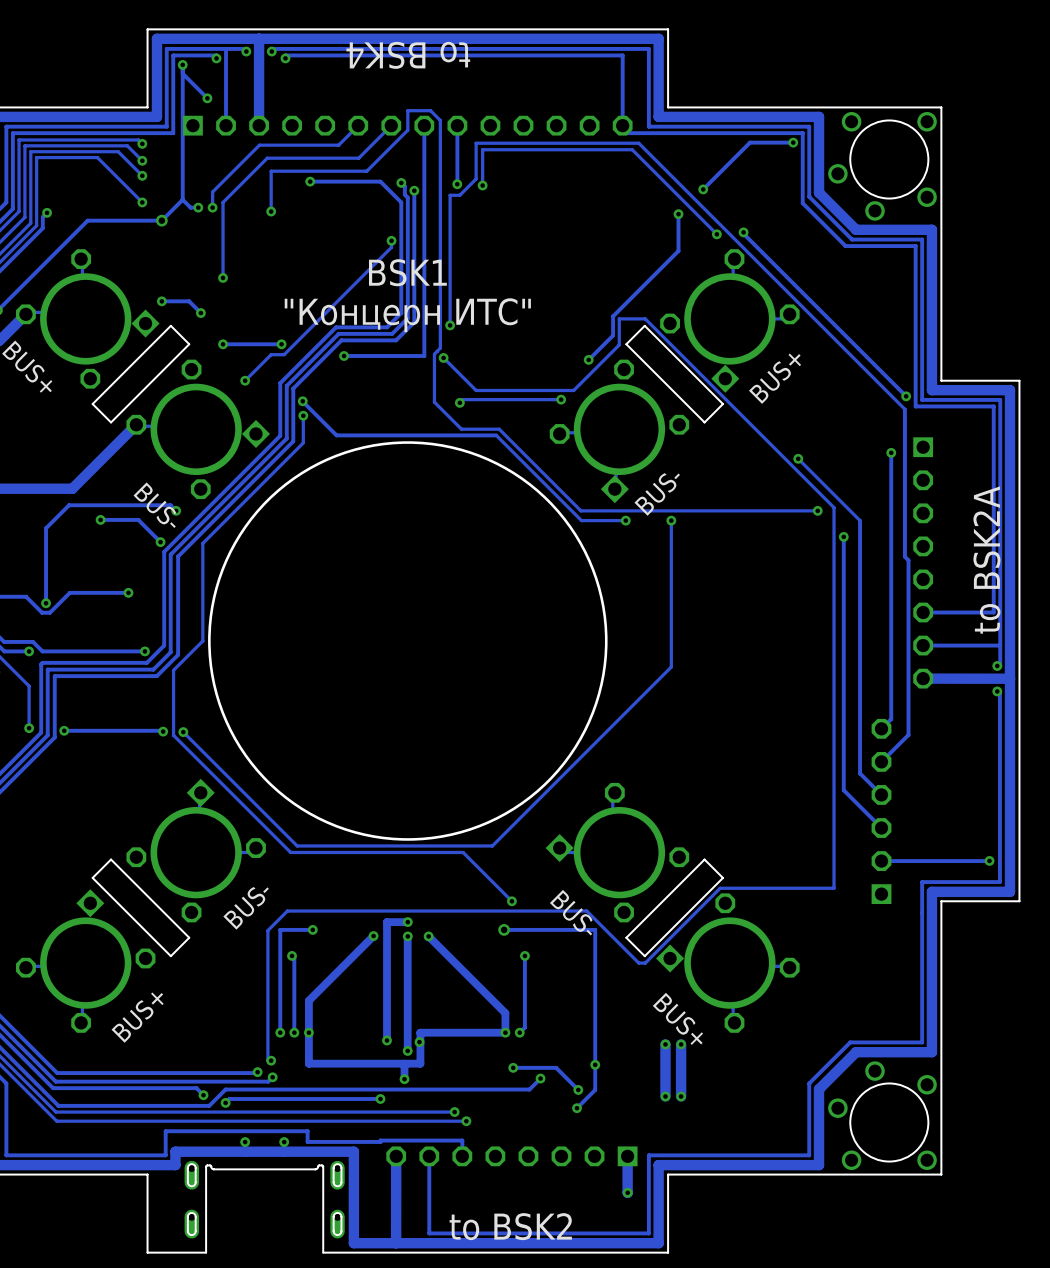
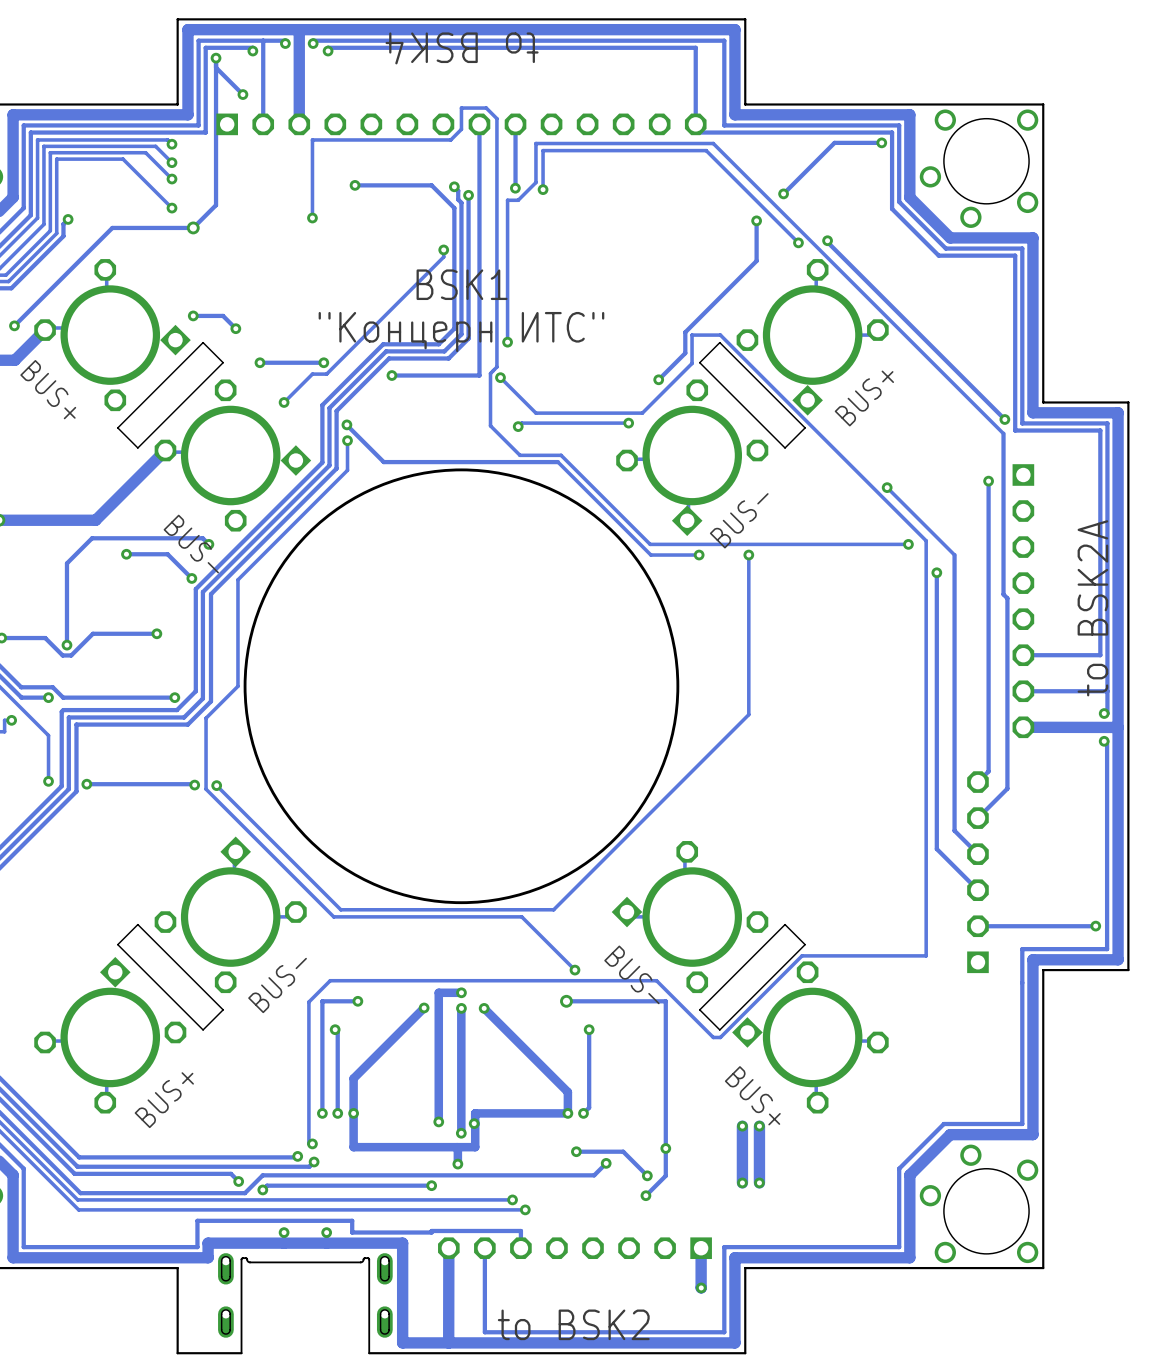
track: (358, 125) (338, 145) (259, 145) (212, 192) (212, 207) -> none
track: (391, 125) (358, 158) (267, 158) (223, 202) (223, 277) -> none
track: (398, 139) (366, 171) (271, 171) -> (450, 139) (312, 139) (312, 174)
track: (182, 199) (190, 207) (198, 207) -> none
via: (198, 207) -> none
via: (212, 207) -> none
via: (223, 277) -> none

